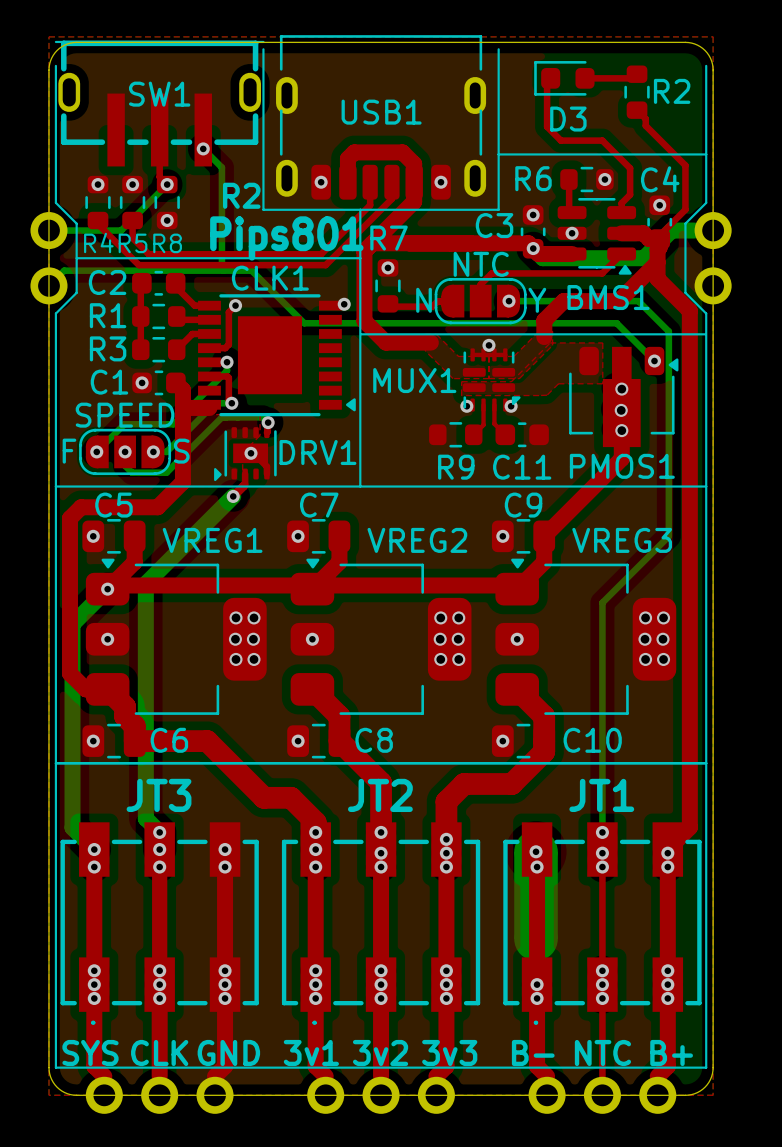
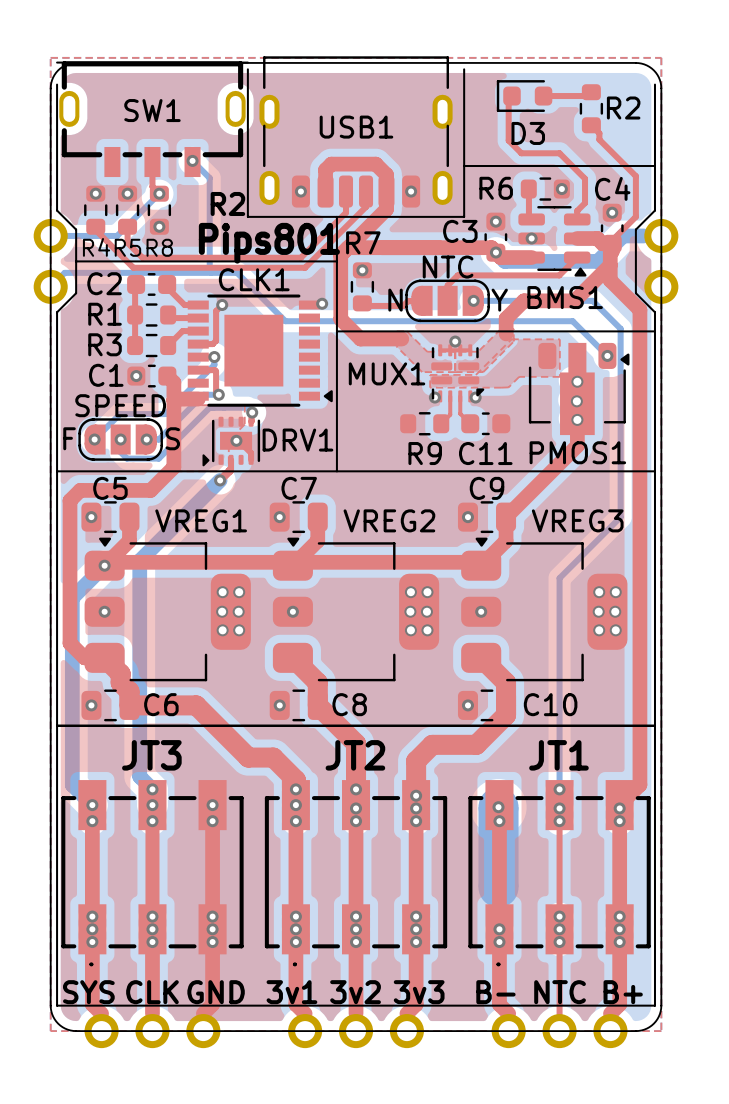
SW1 footprint: [58, 40, 262, 167] -> [59, 61, 246, 178]

